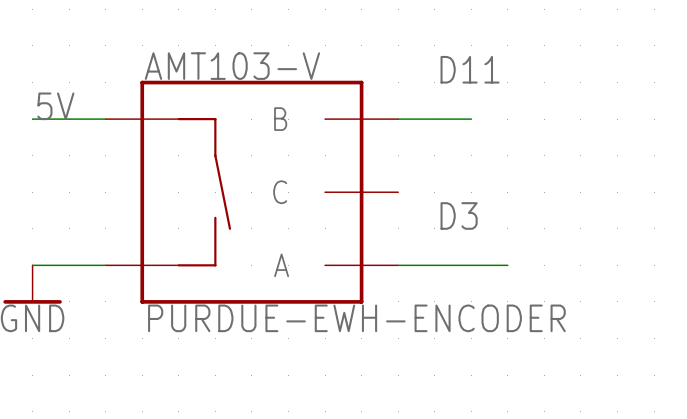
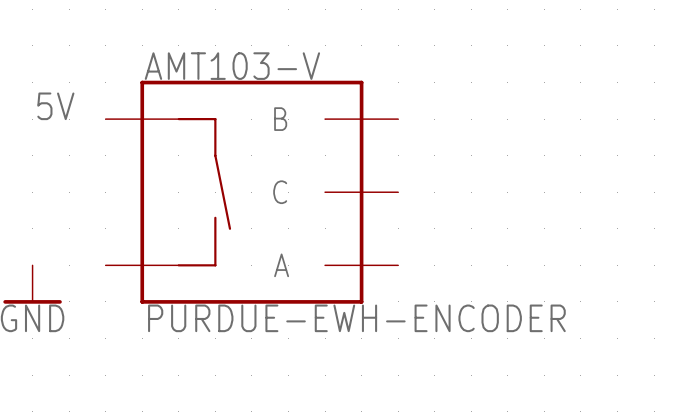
label: D11 (470, 69) -> none
wire: (32, 119) (105, 119) -> none
wire: (398, 119) (471, 119) -> none
label: D3 (459, 215) -> none
wire: (32, 265) (105, 265) -> none
wire: (398, 265) (507, 265) -> none

